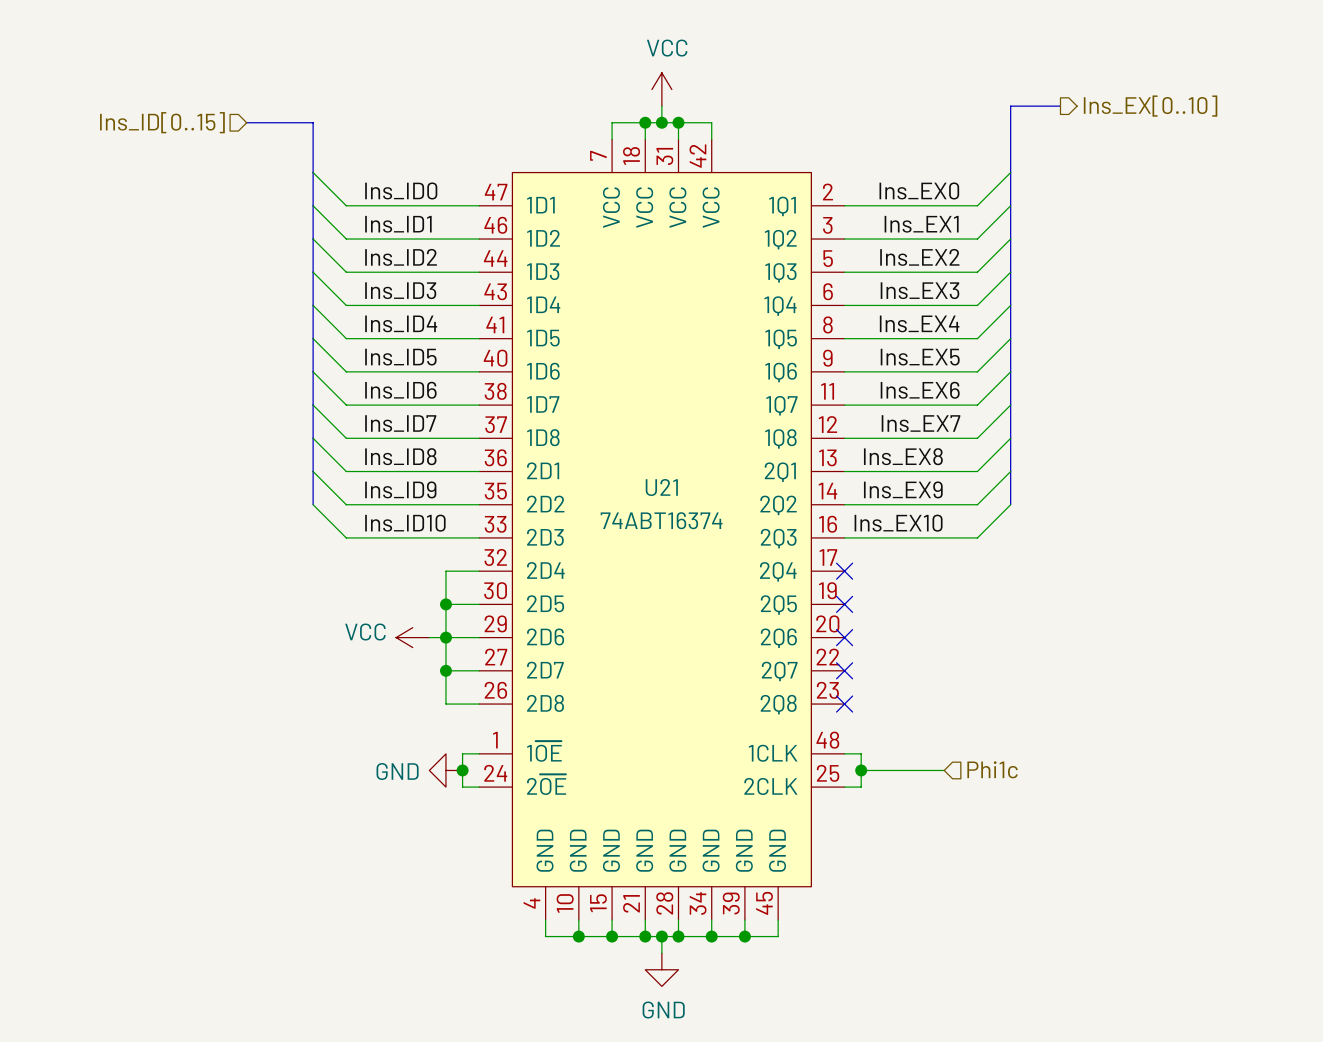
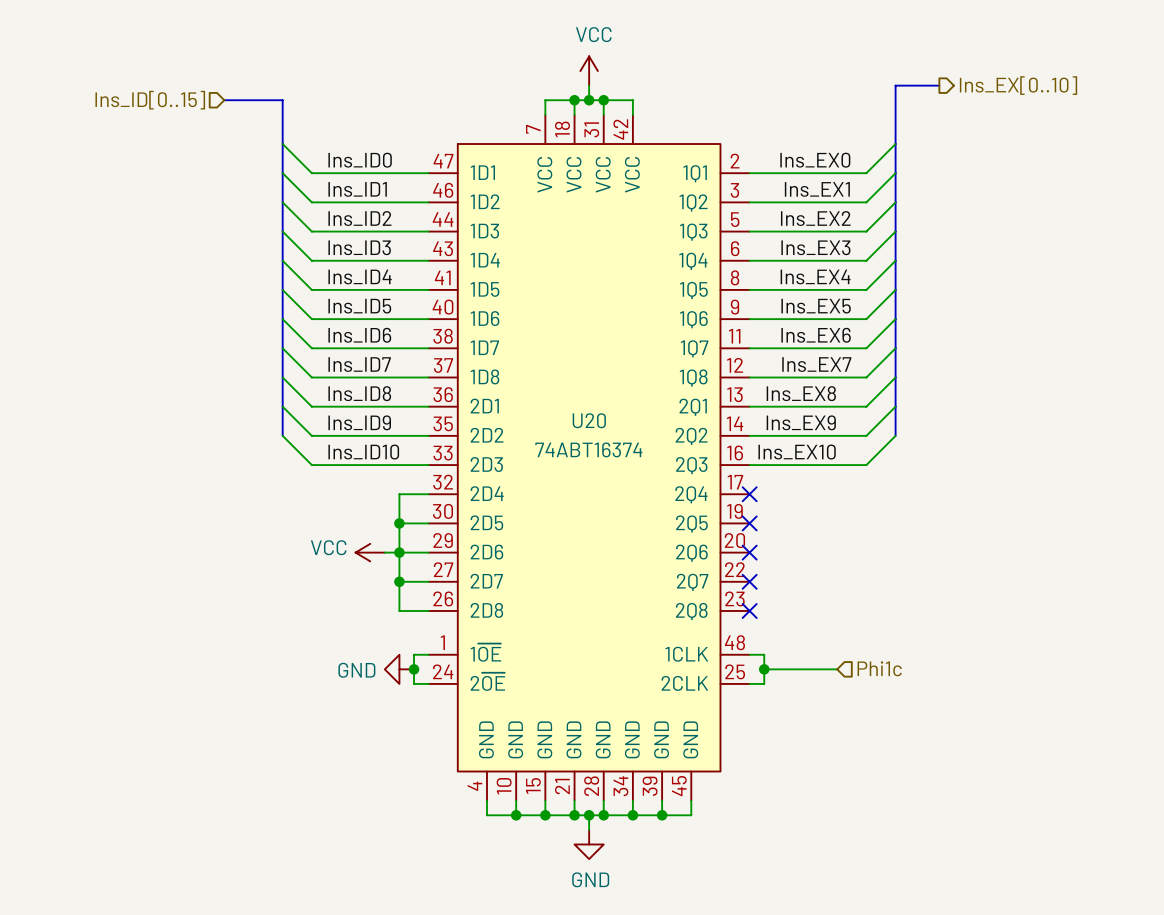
U21 name: U21 (661, 487) -> U20 (589, 420)

